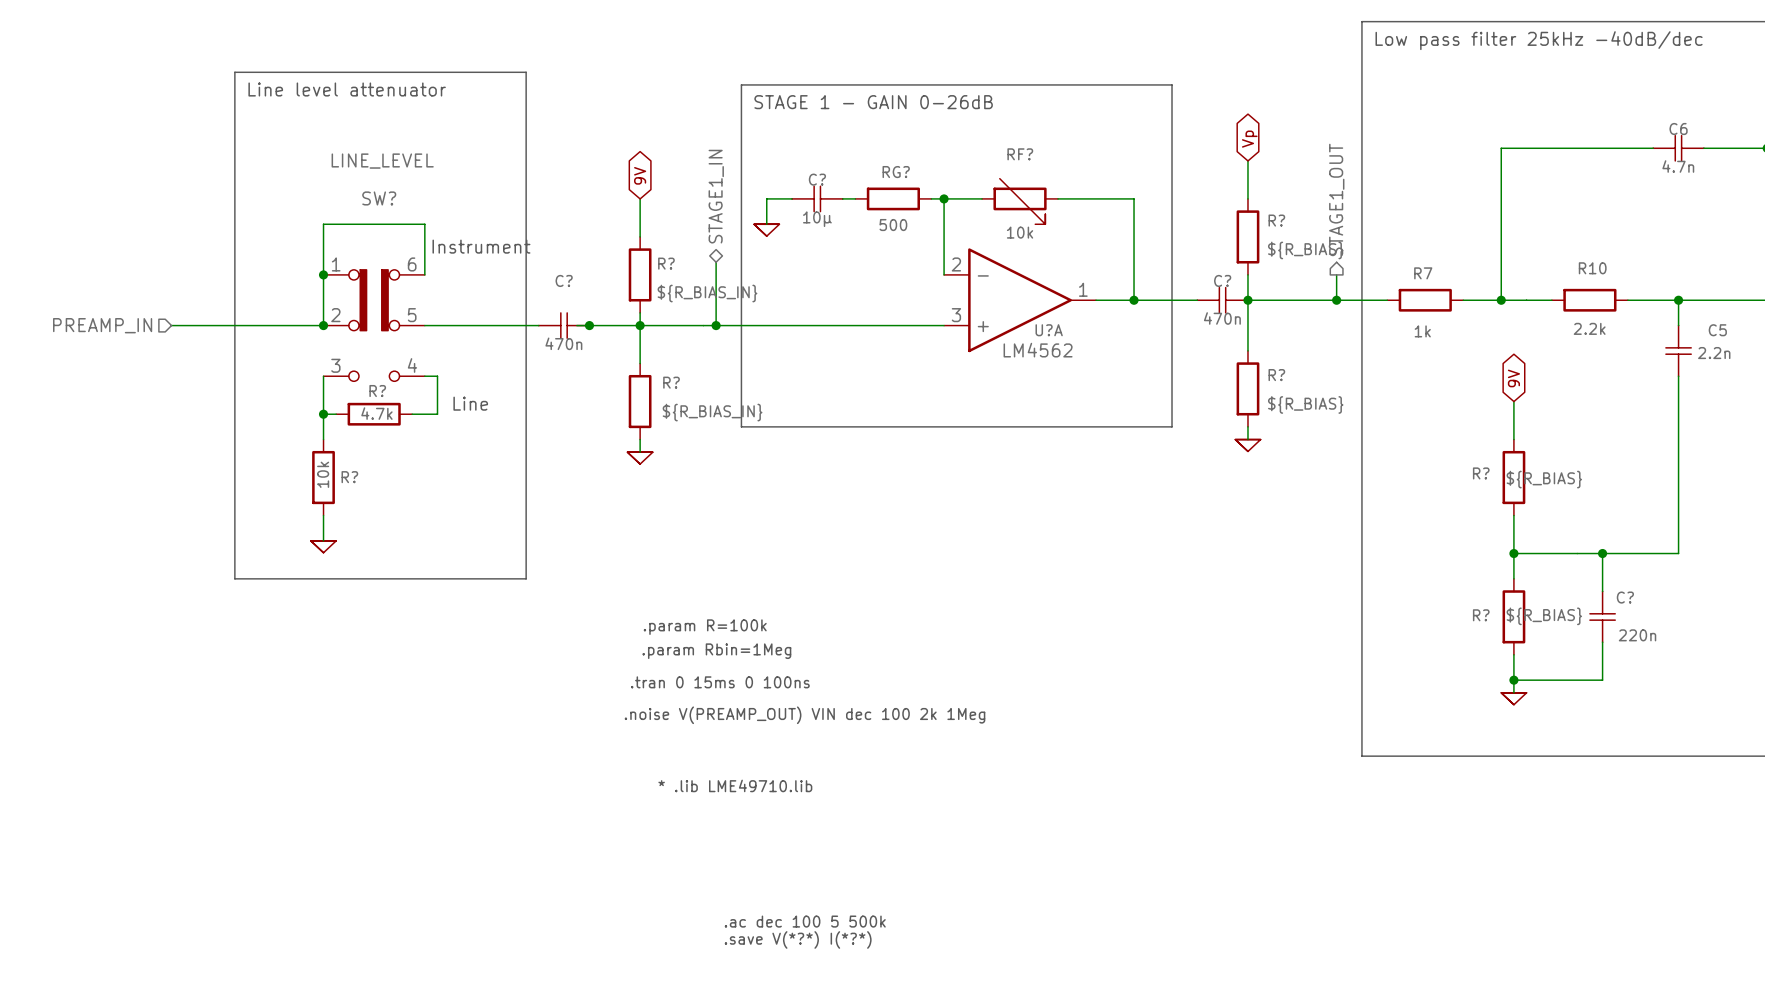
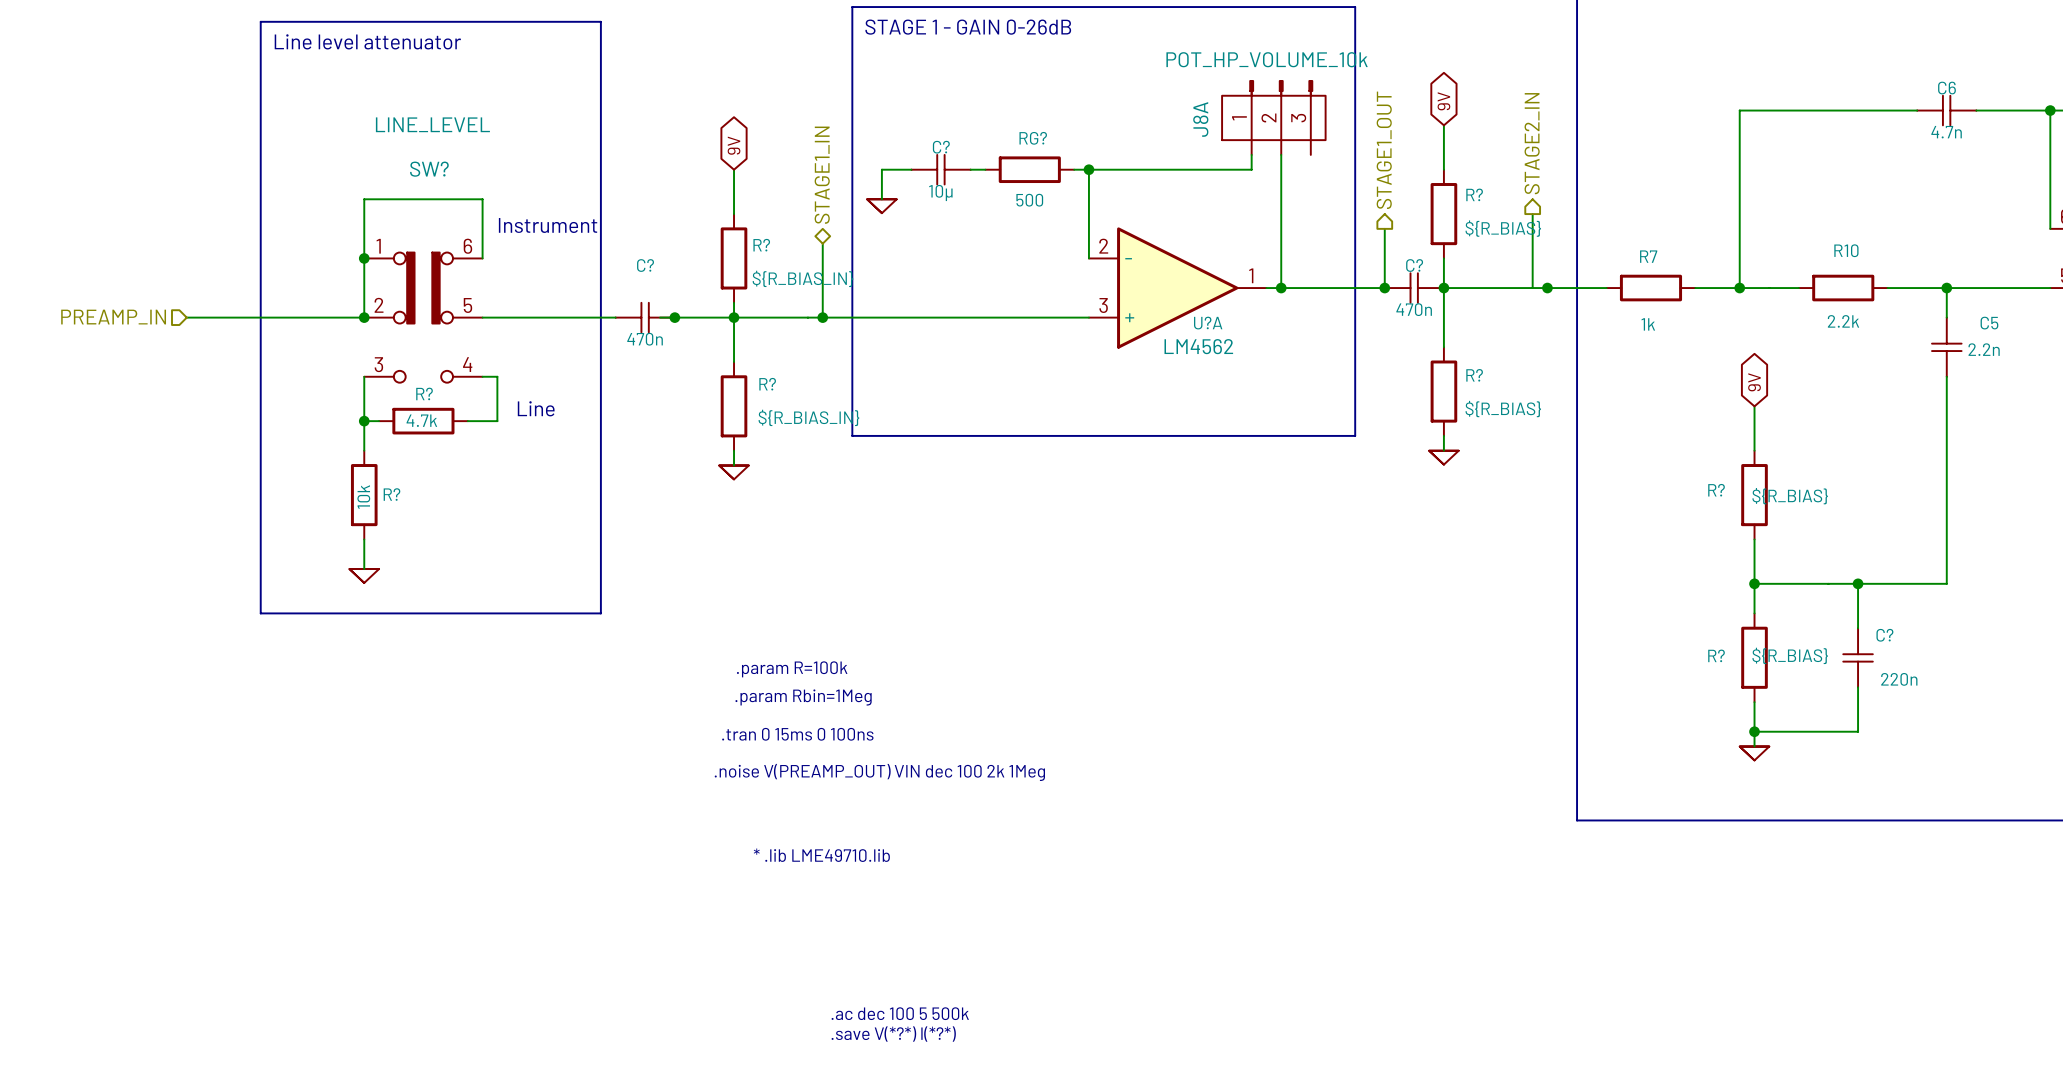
line: (741, 84) (1172, 84) -> (852, 36) (852, 7) (1355, 7) (1355, 36)
text position: STAGE 1 - GAIN 0-26dB (873, 102) -> STAGE 1 - GAIN 0-26dB (968, 27)
global label: Vp (1249, 139) -> 9V (1443, 101)
J8A: none -> POT_HP_VOLUME_10k (1273, 117)
hierarchical label: none -> STAGE2_IN (1532, 143)
wire: none -> (1281, 154) (1281, 288)
wire: none -> (1133, 169) (1222, 169)
wire: (1083, 198) (1134, 198) (1134, 300) -> (1251, 169) (1251, 154)
hierarchical label position: STAGE1_OUT (1336, 199) -> STAGE1_OUT (1384, 150)
RF?: 10k (1020, 201) -> none
wire: none -> (1532, 214) (1532, 288)
wire: none -> (1384, 228) (1384, 288)
wire: (1336, 274) (1336, 300) -> none
junction position: (1134, 300) -> (1281, 288)
junction: none -> (1384, 288)

